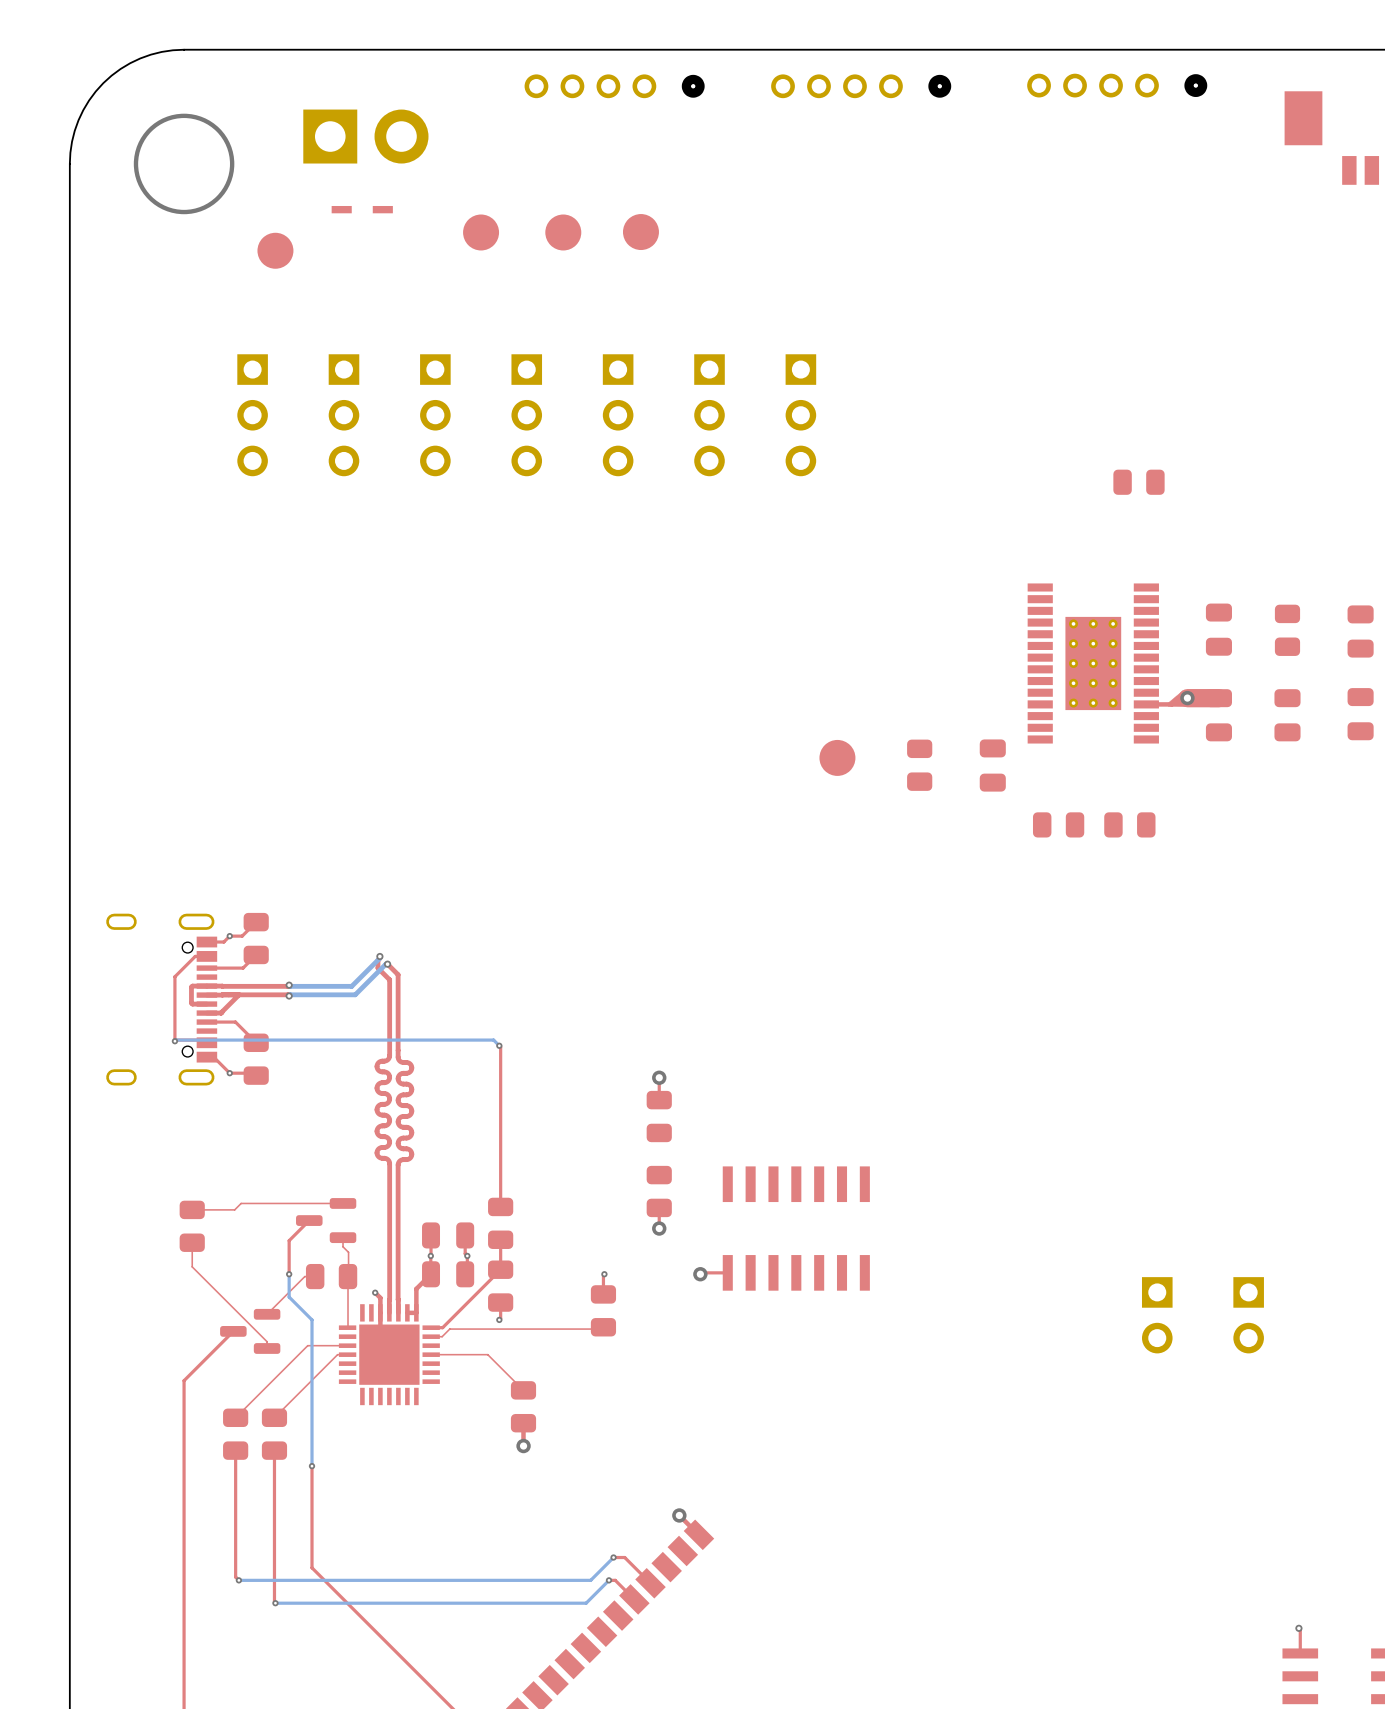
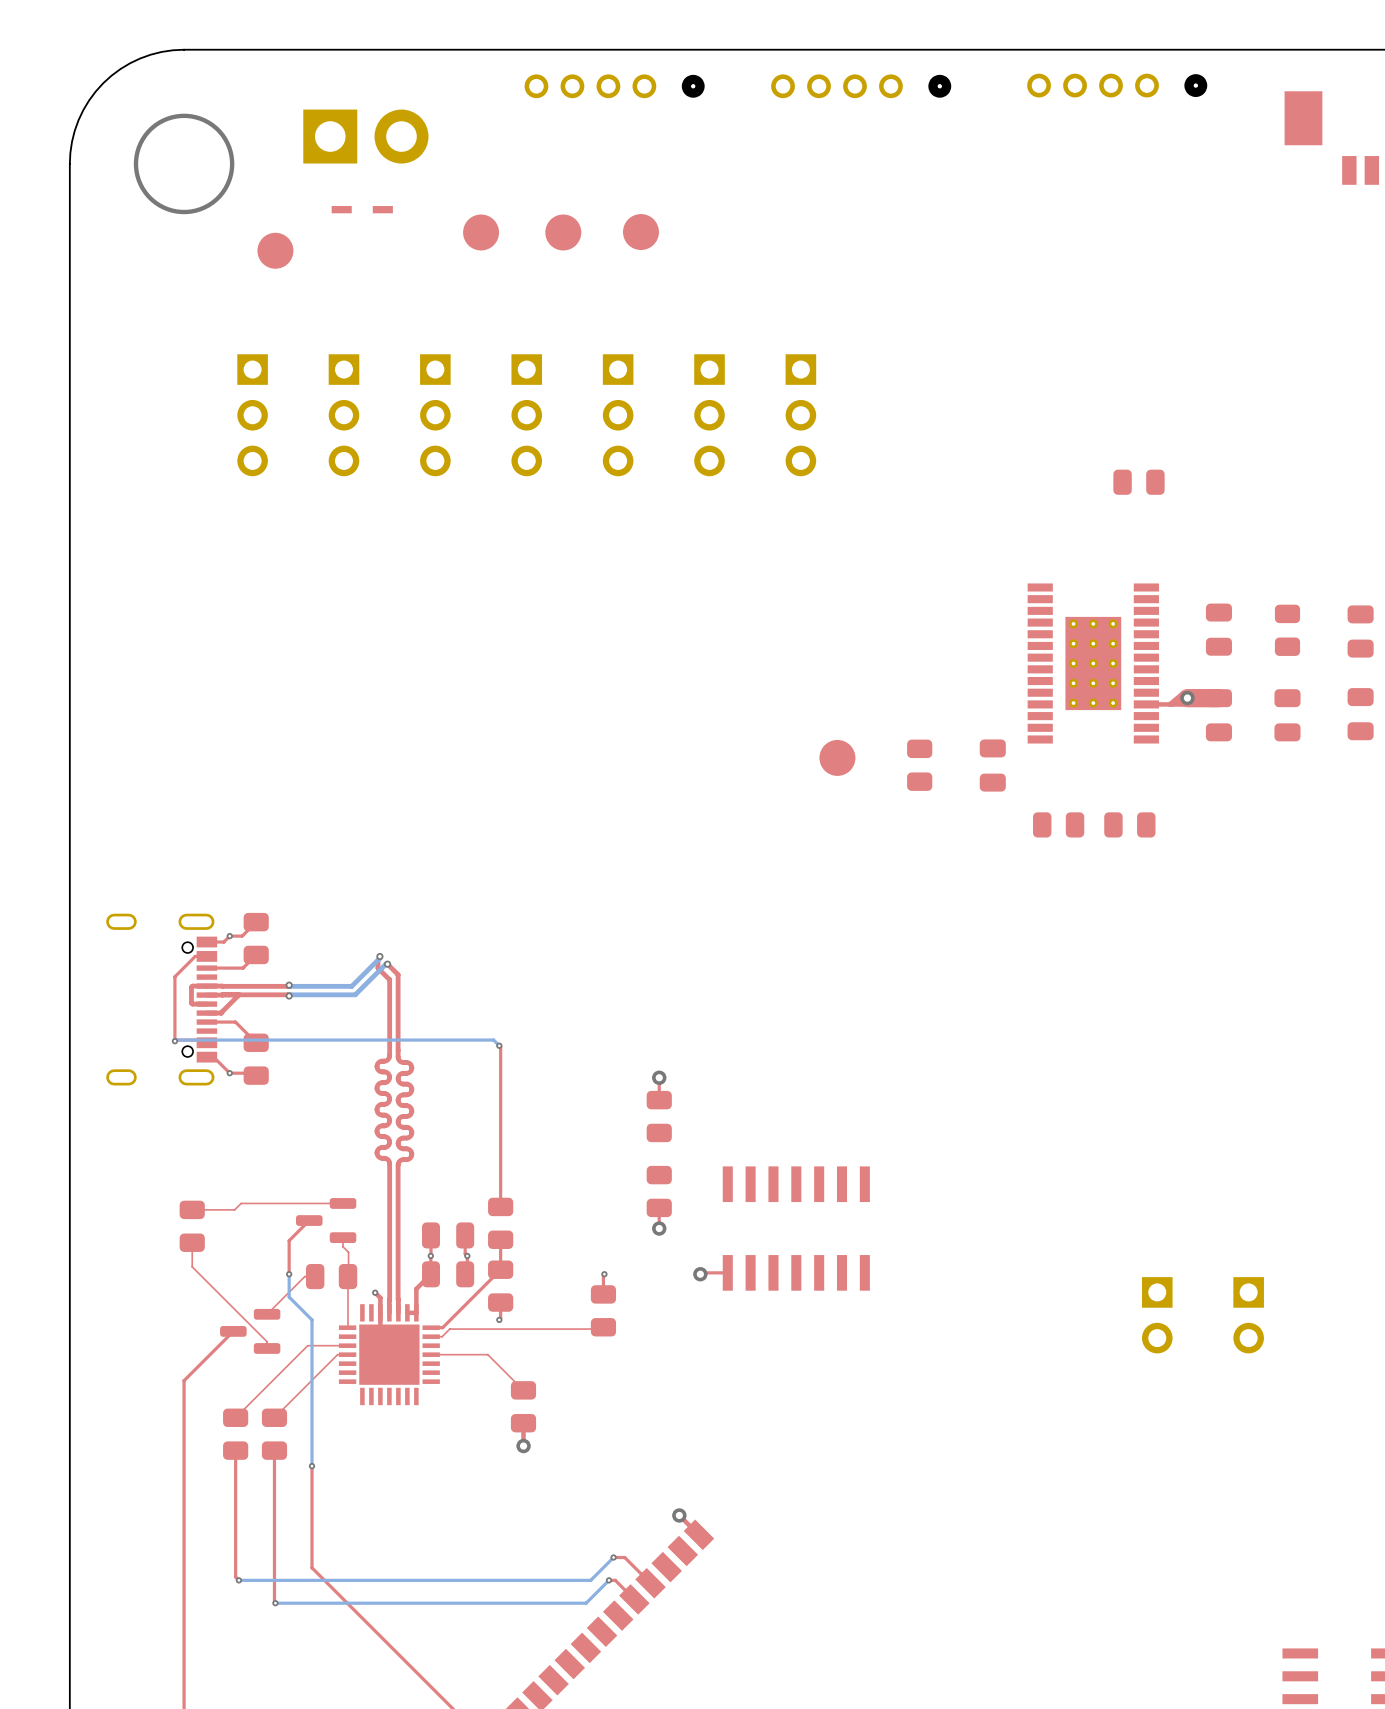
top track: (1298, 1628) (1300, 1653) -> none
via: (1298, 1628) -> none

